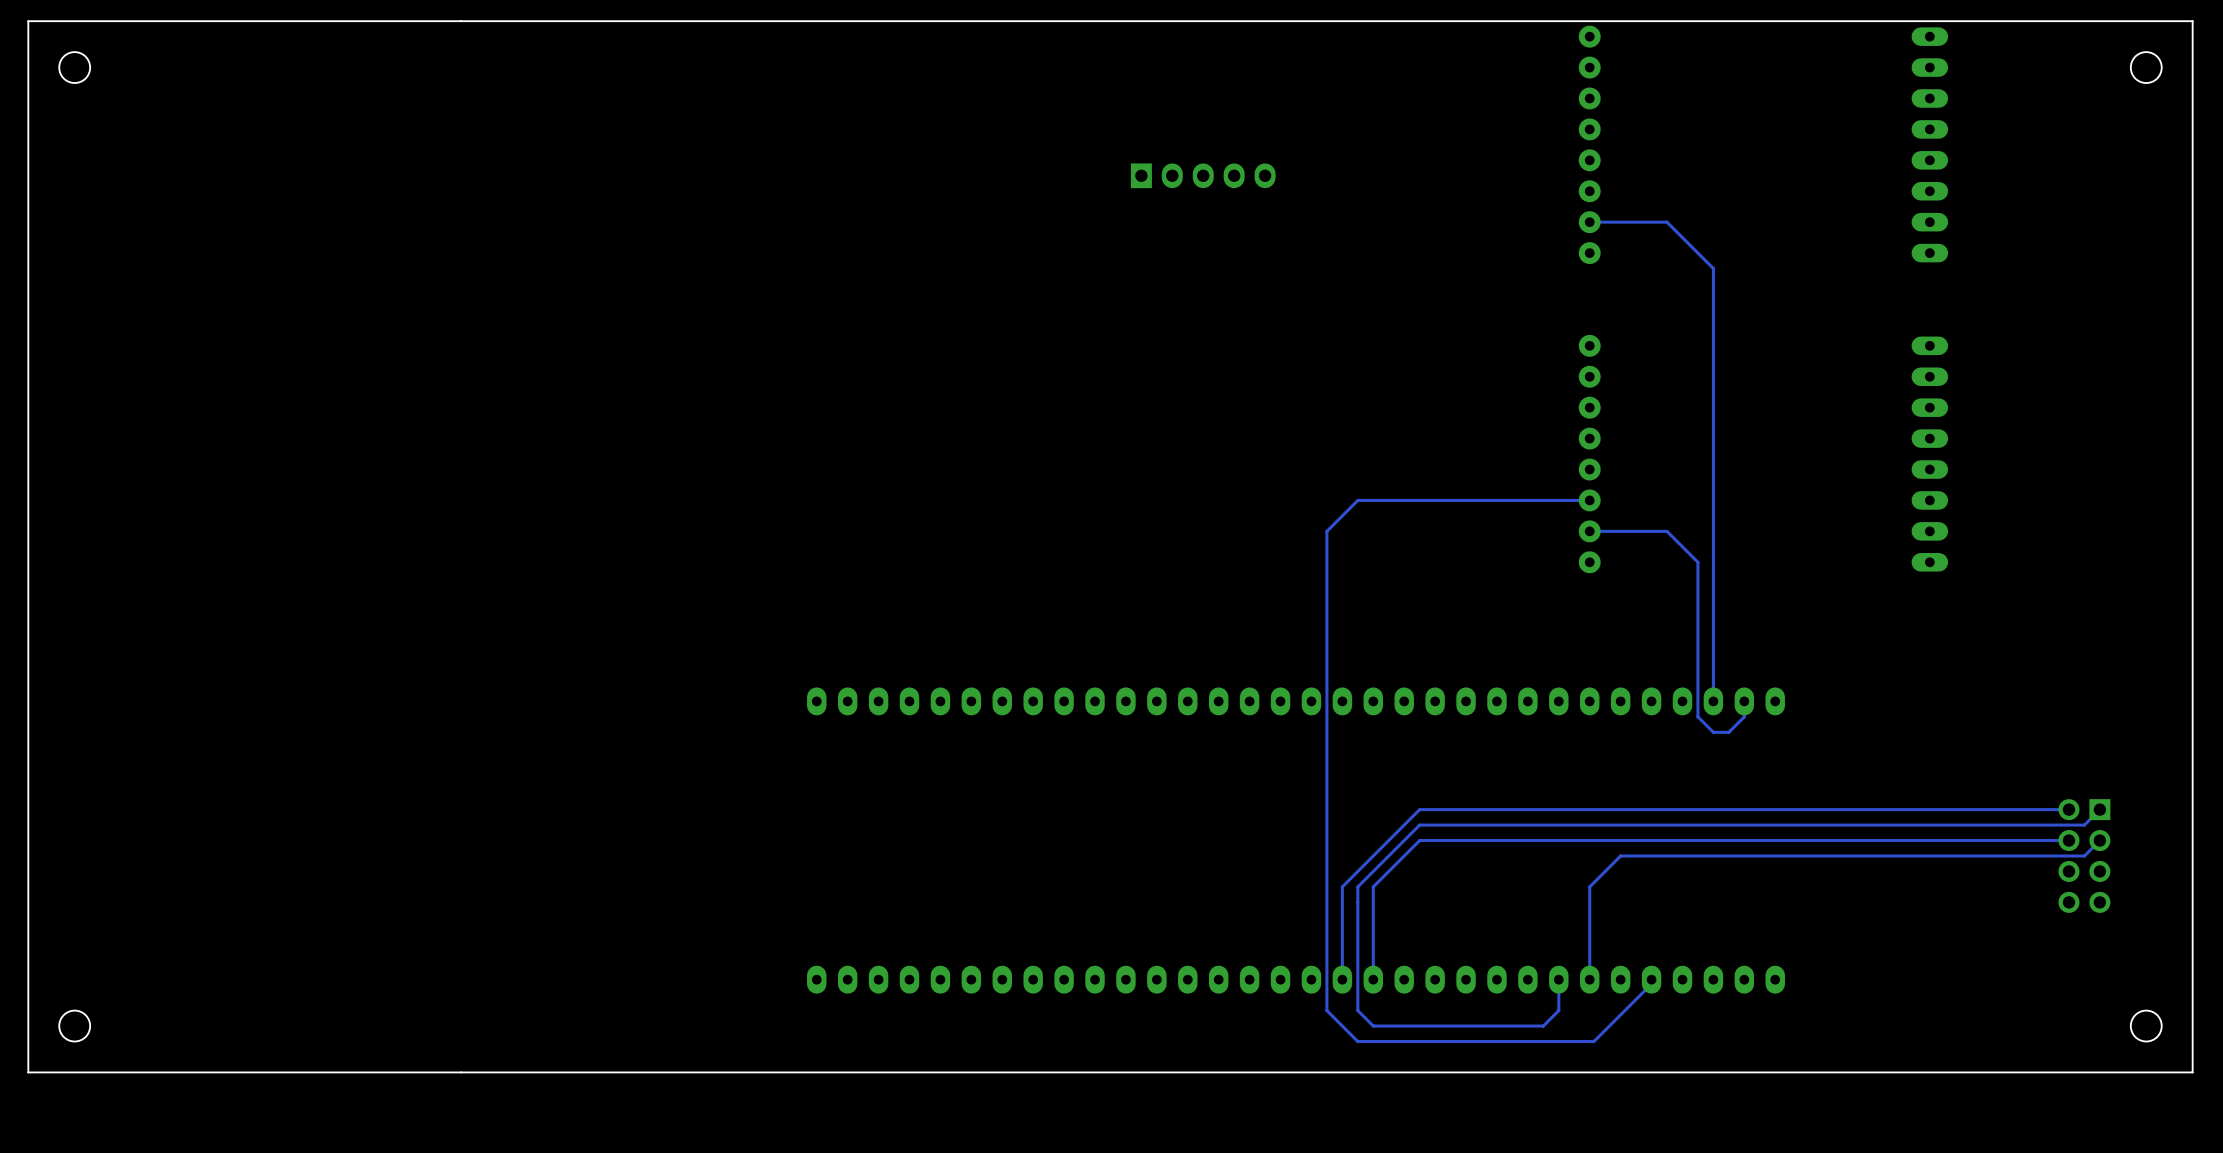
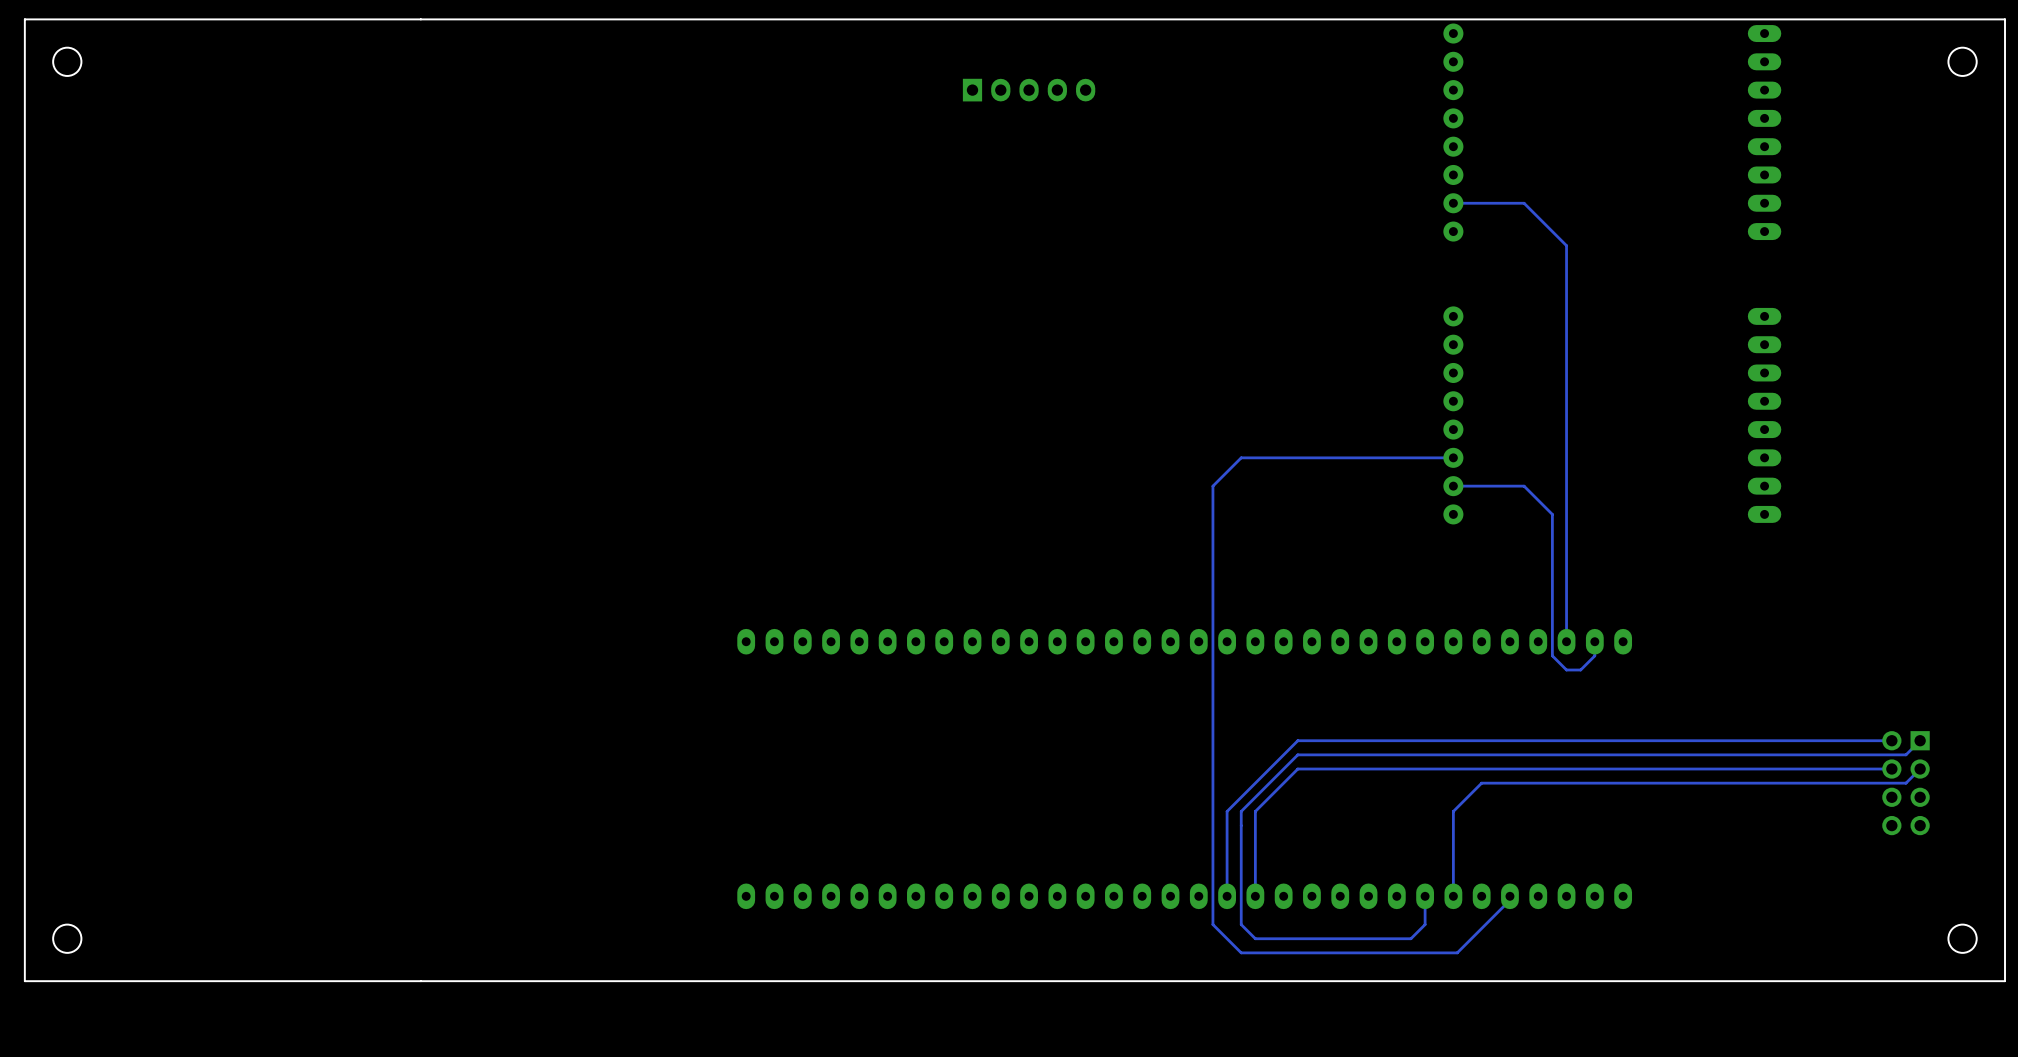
part position: (1203, 175) -> (1029, 90)

